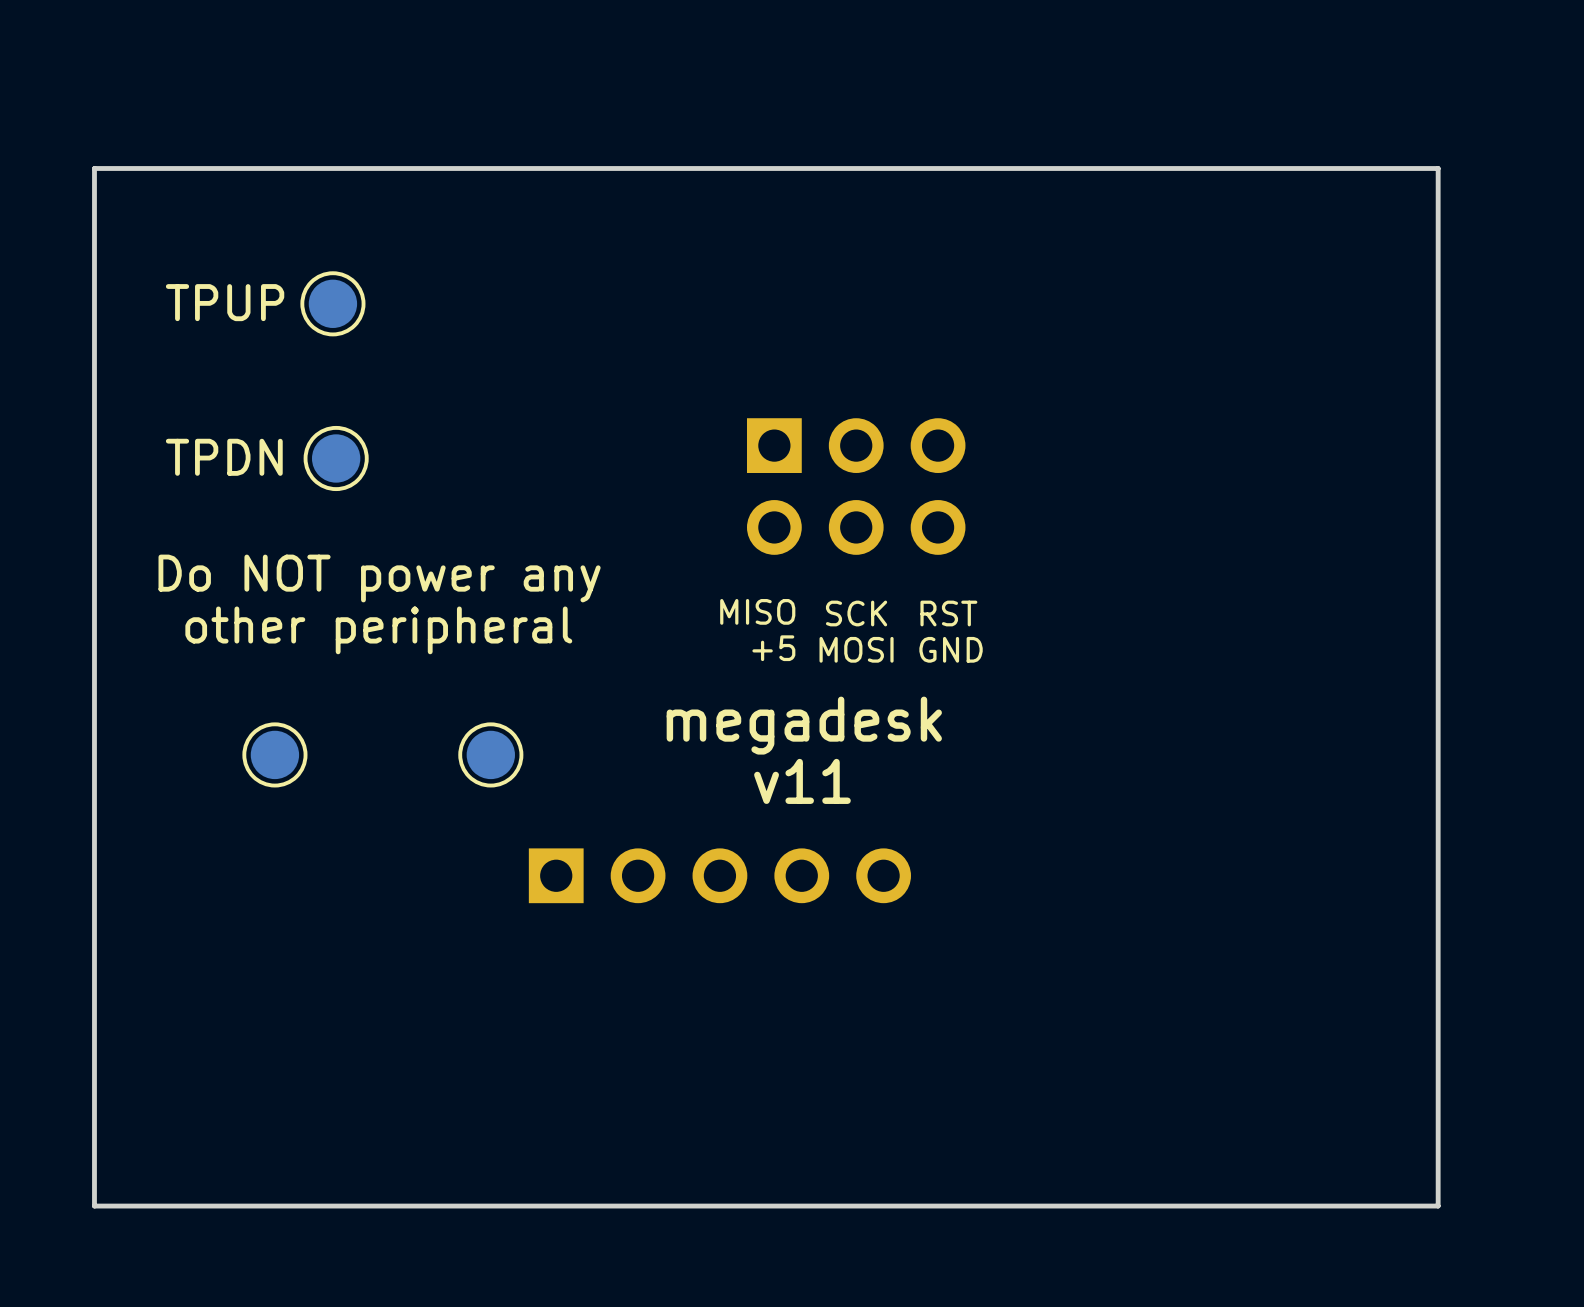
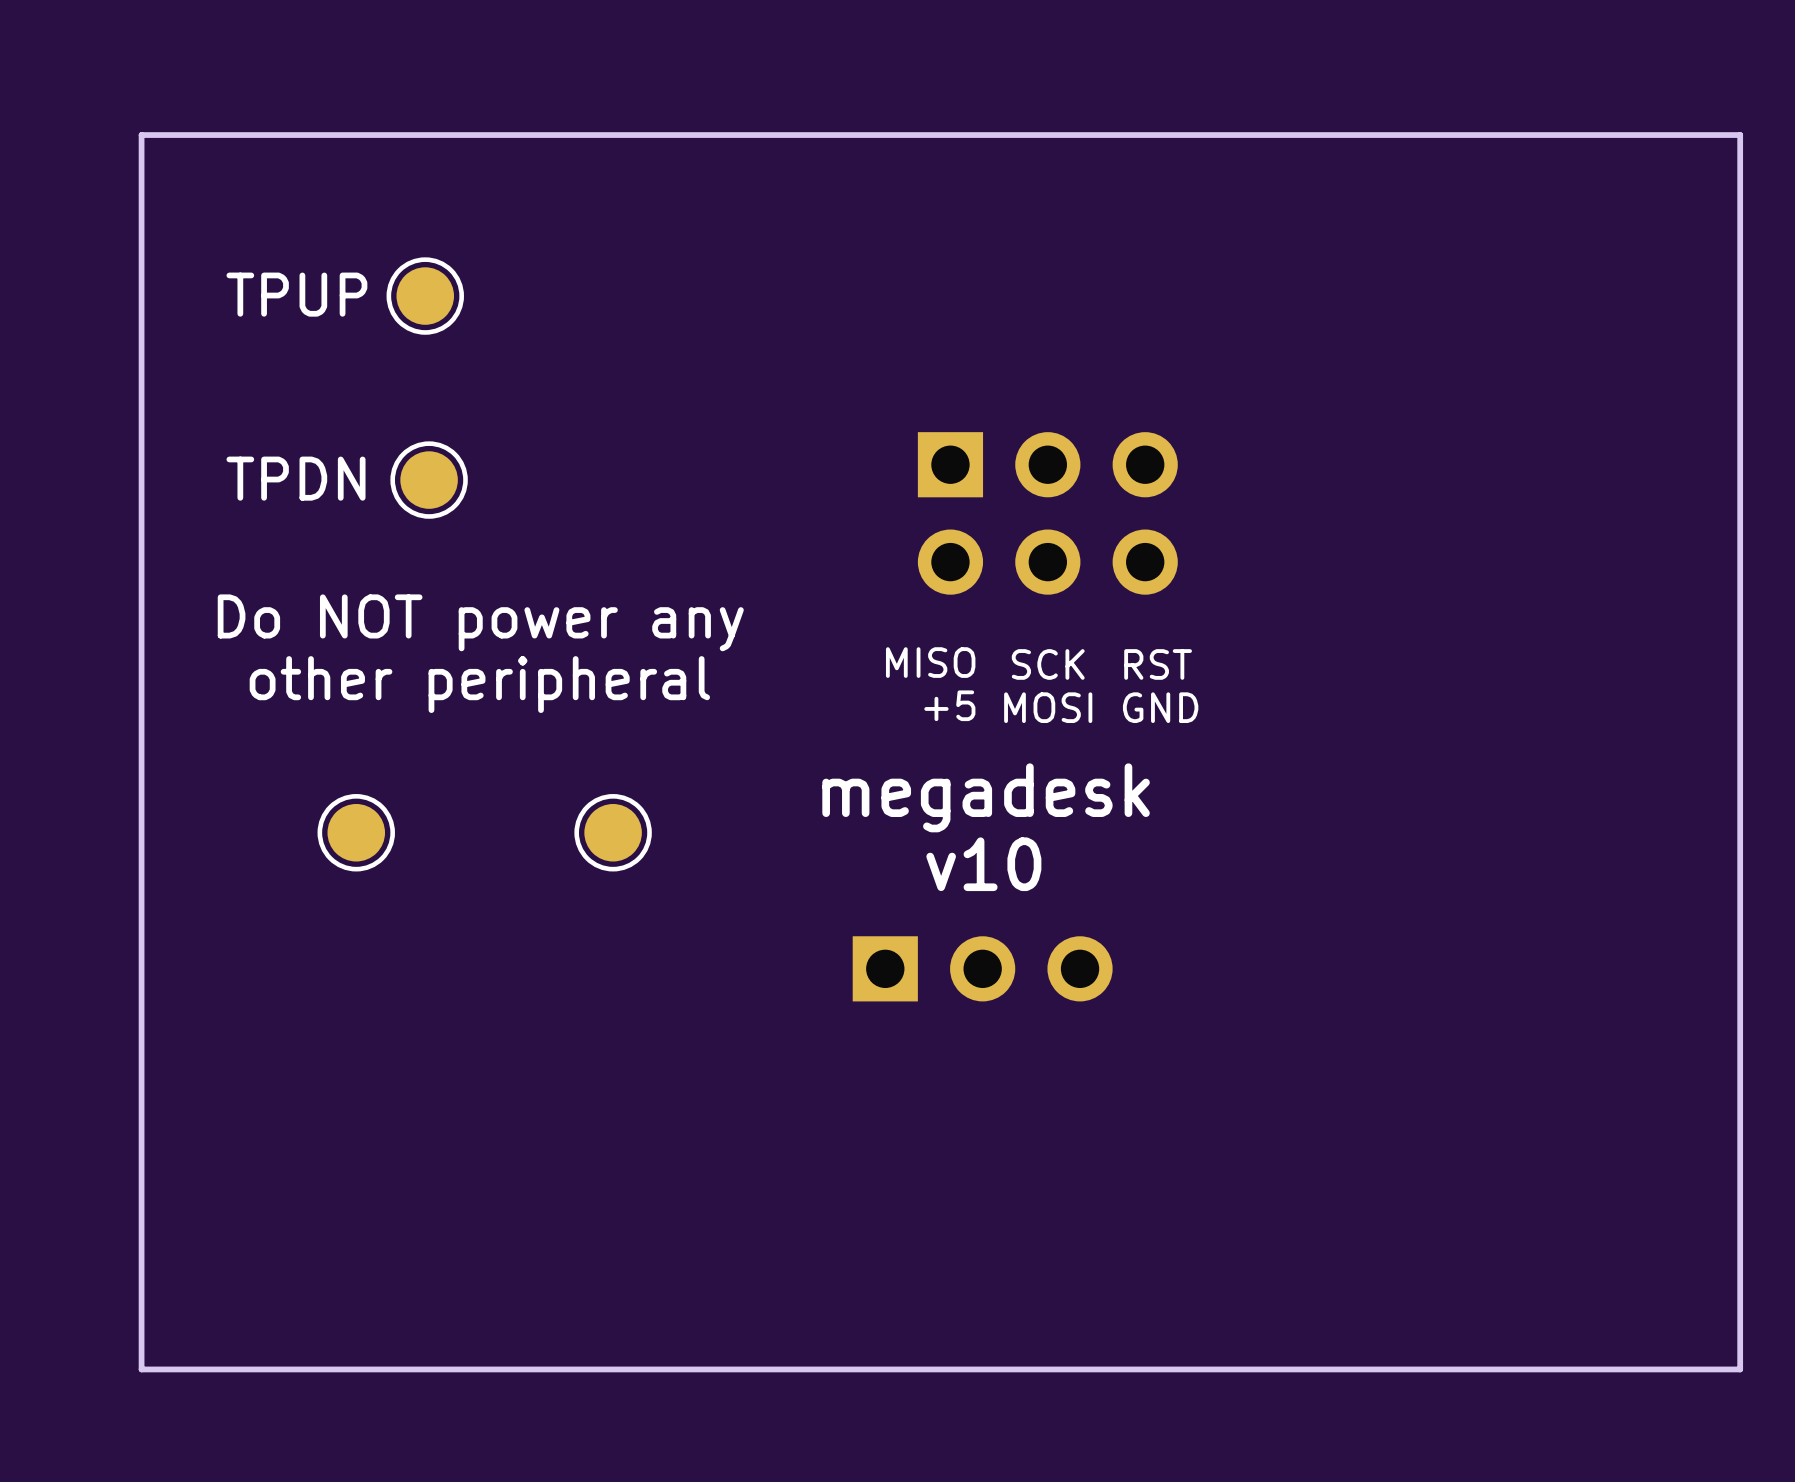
text: v11 (802, 781) -> v10 (983, 864)
part: none -> (982, 968)
part: (719, 875) -> none

